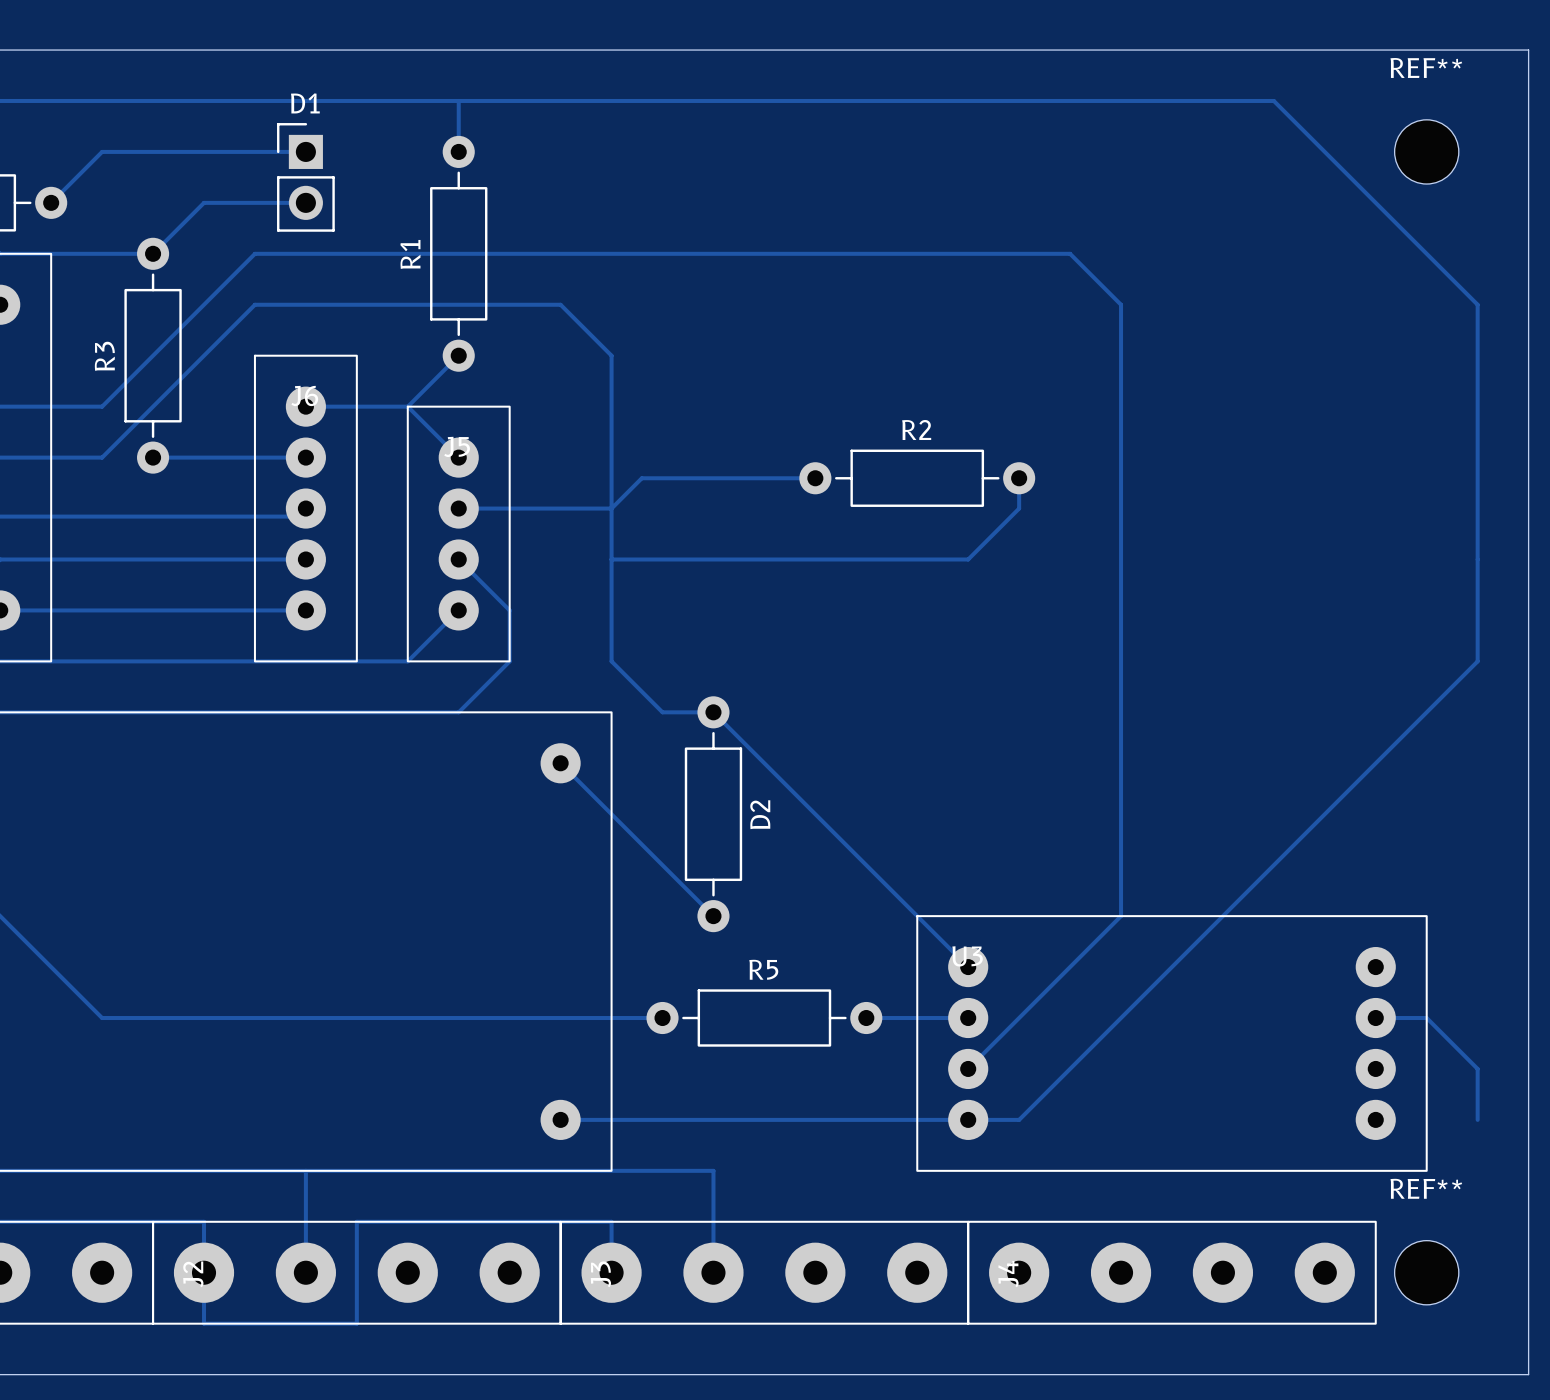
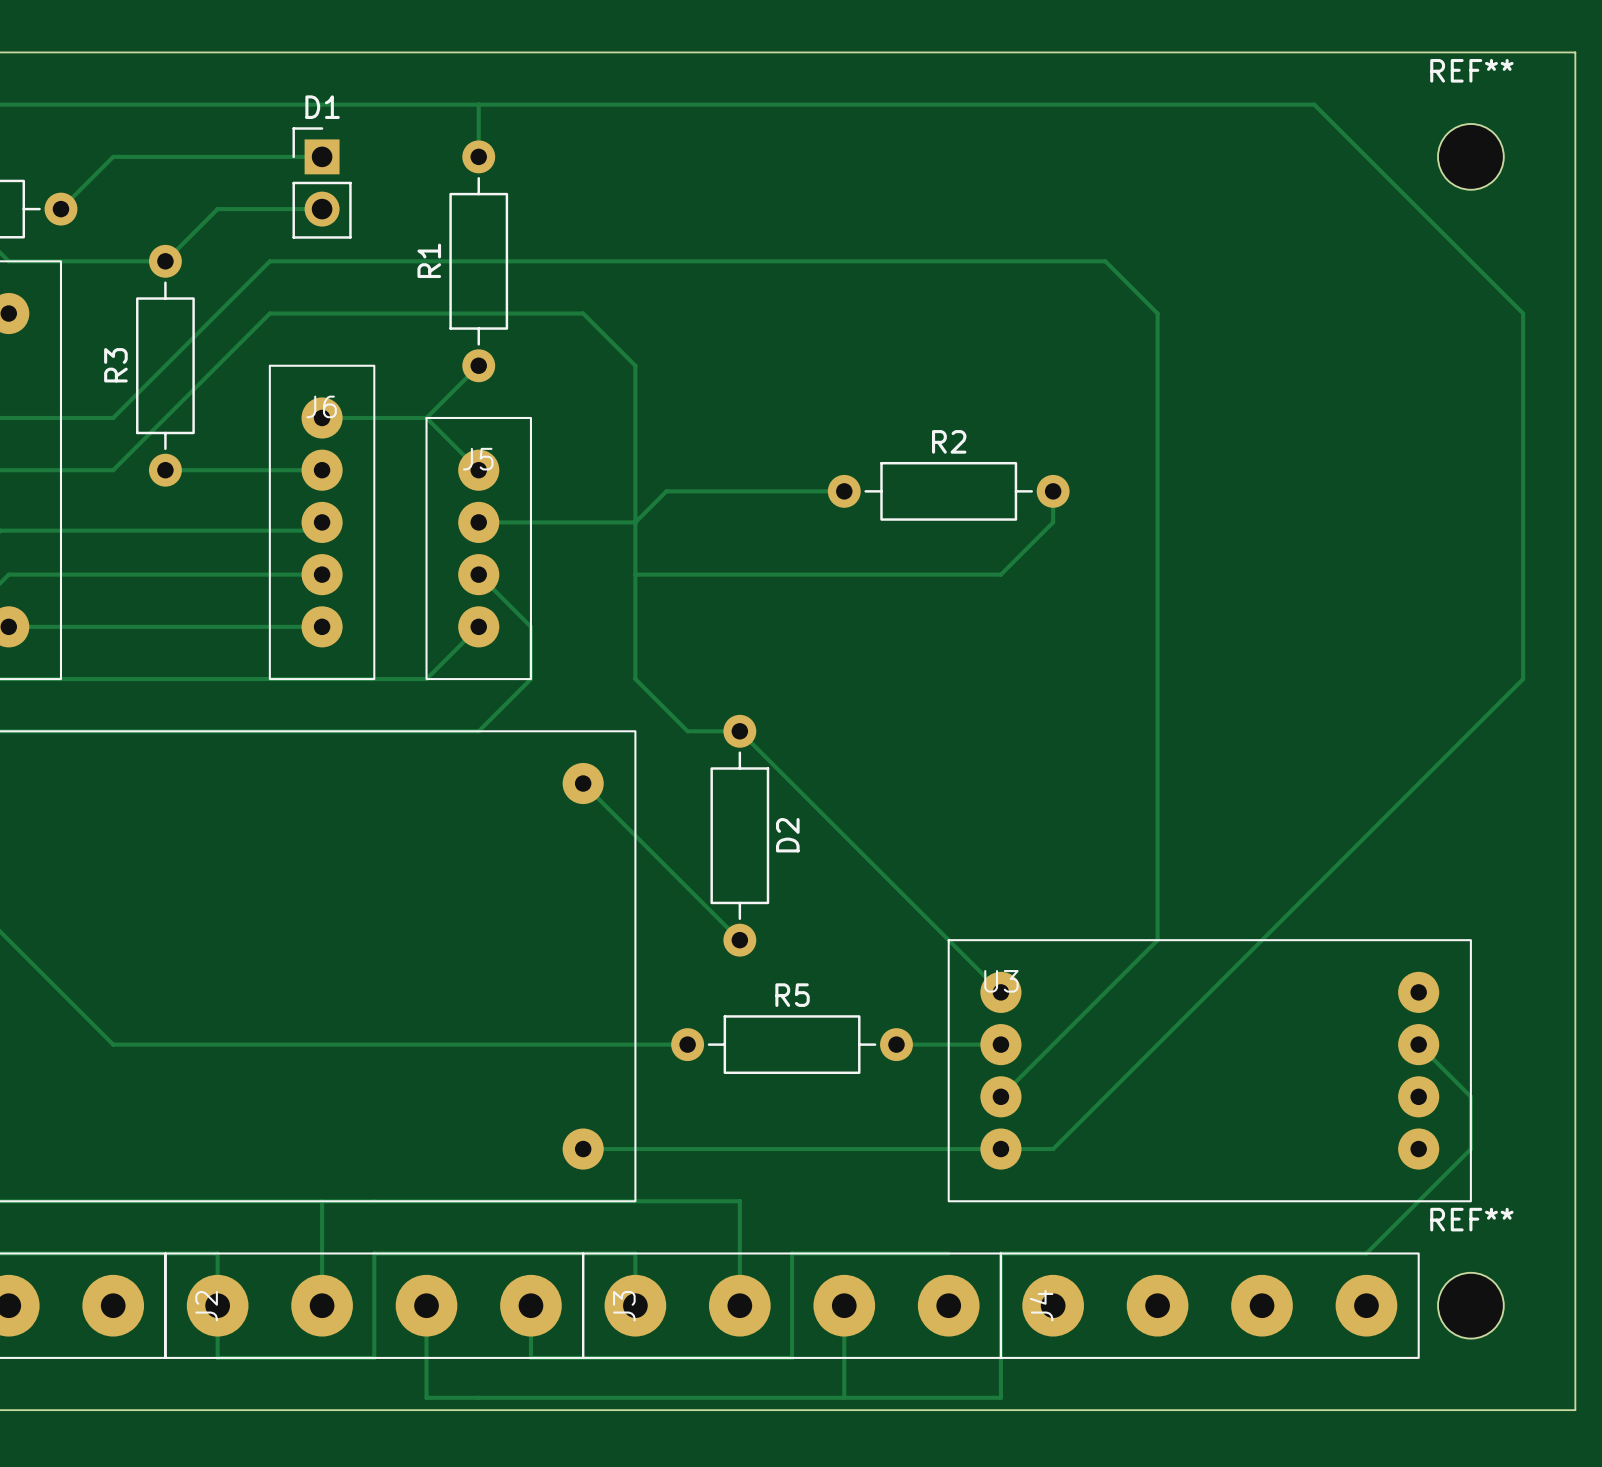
track: (1375, 1018) (1426, 1018) (1477, 1068) (1477, 1119) -> (1418, 1044) (1470, 1096) (1470, 1149) (1366, 1253) (1000, 1253) (1000, 1397) (426, 1397) (426, 1305)
track: none -> (948, 1253) (792, 1253) (792, 1357) (530, 1357) (530, 1305)
track: none -> (844, 1305) (844, 1397)

